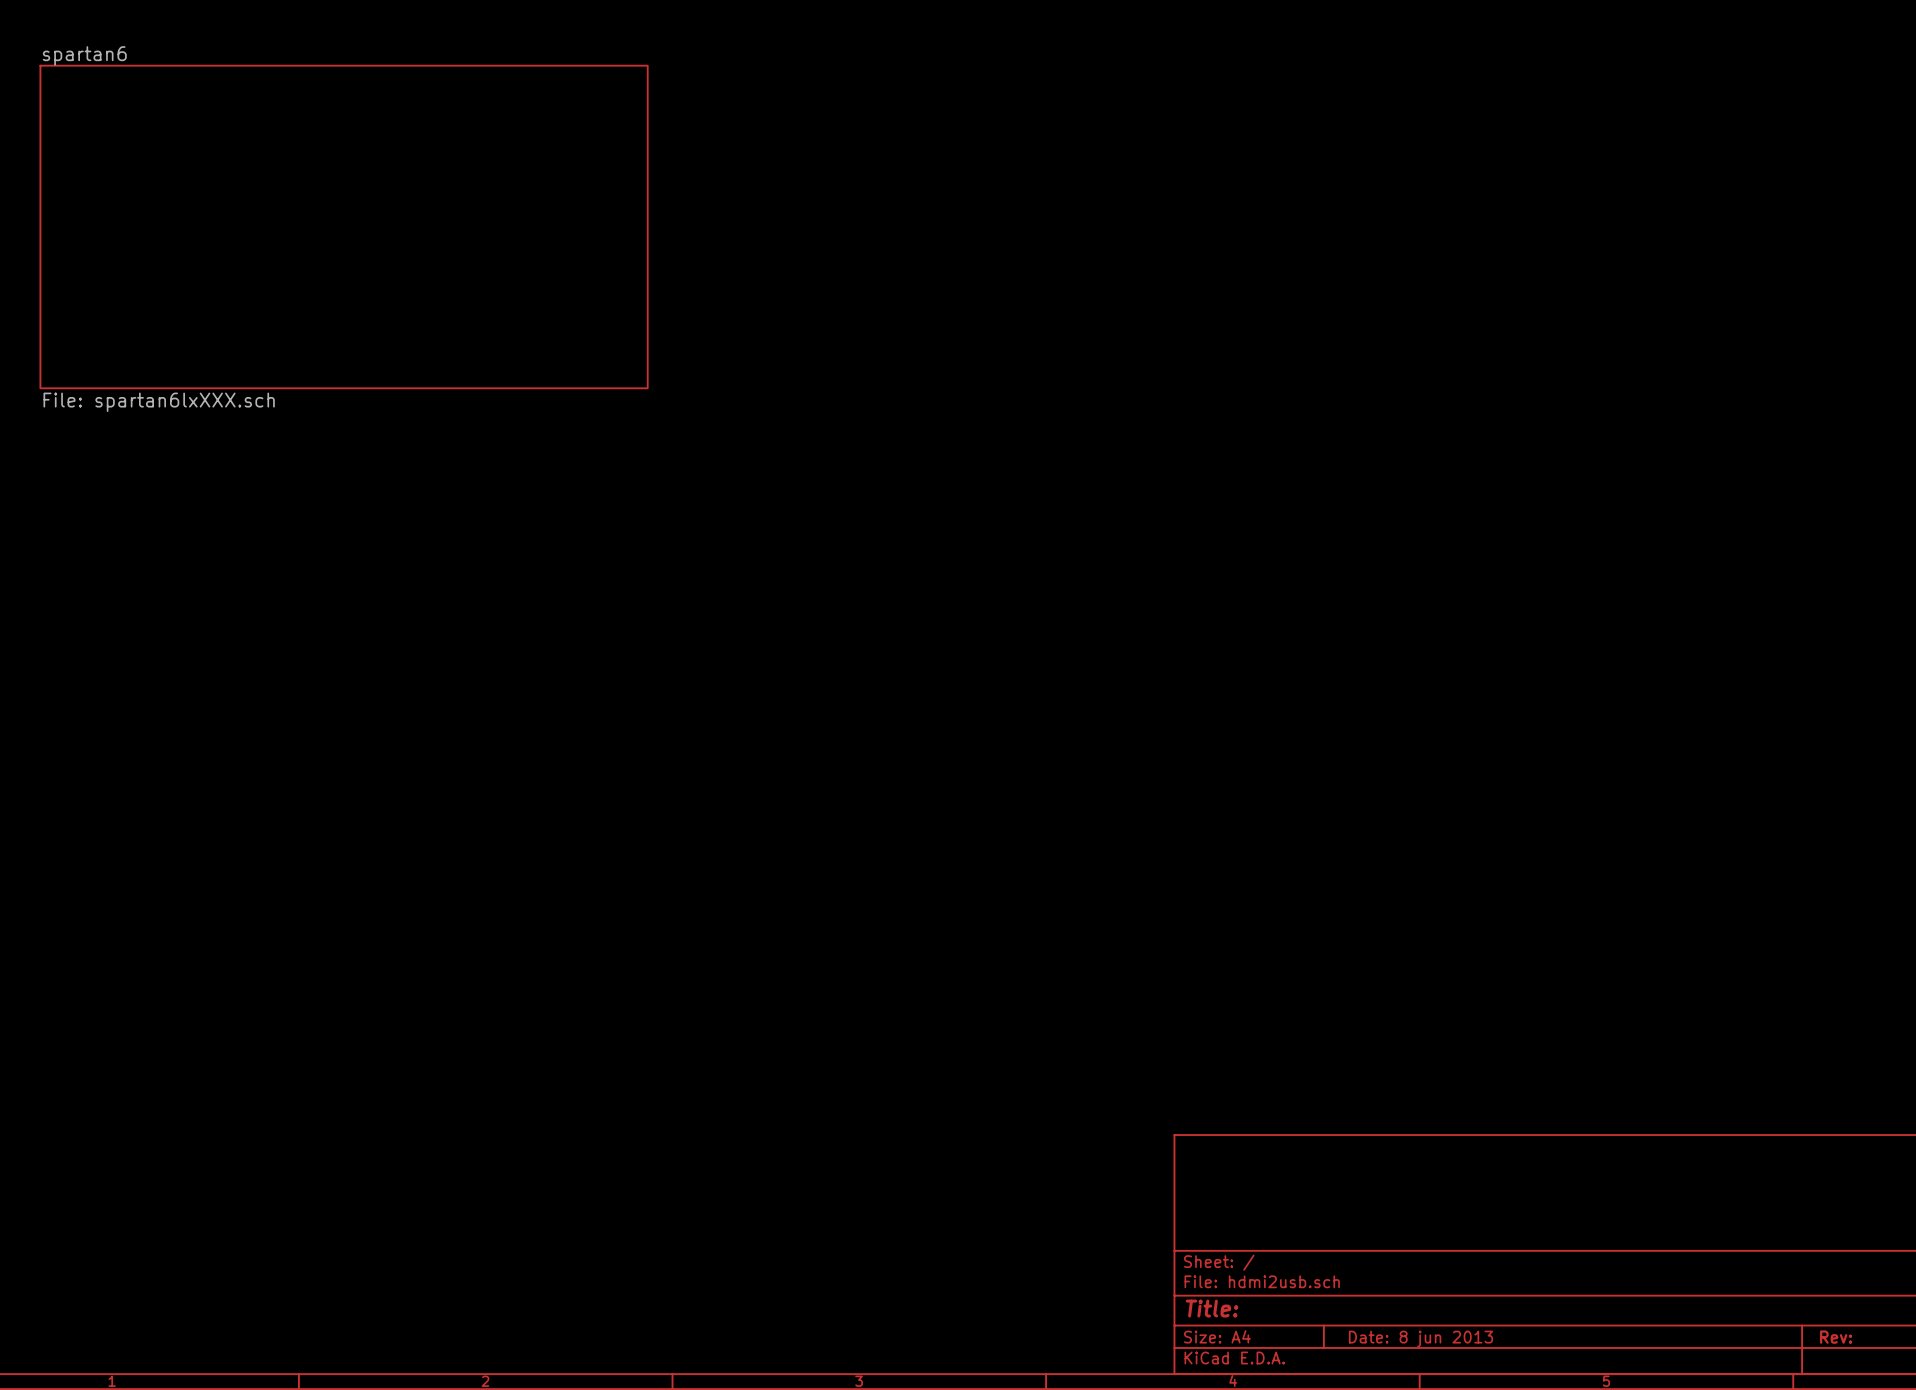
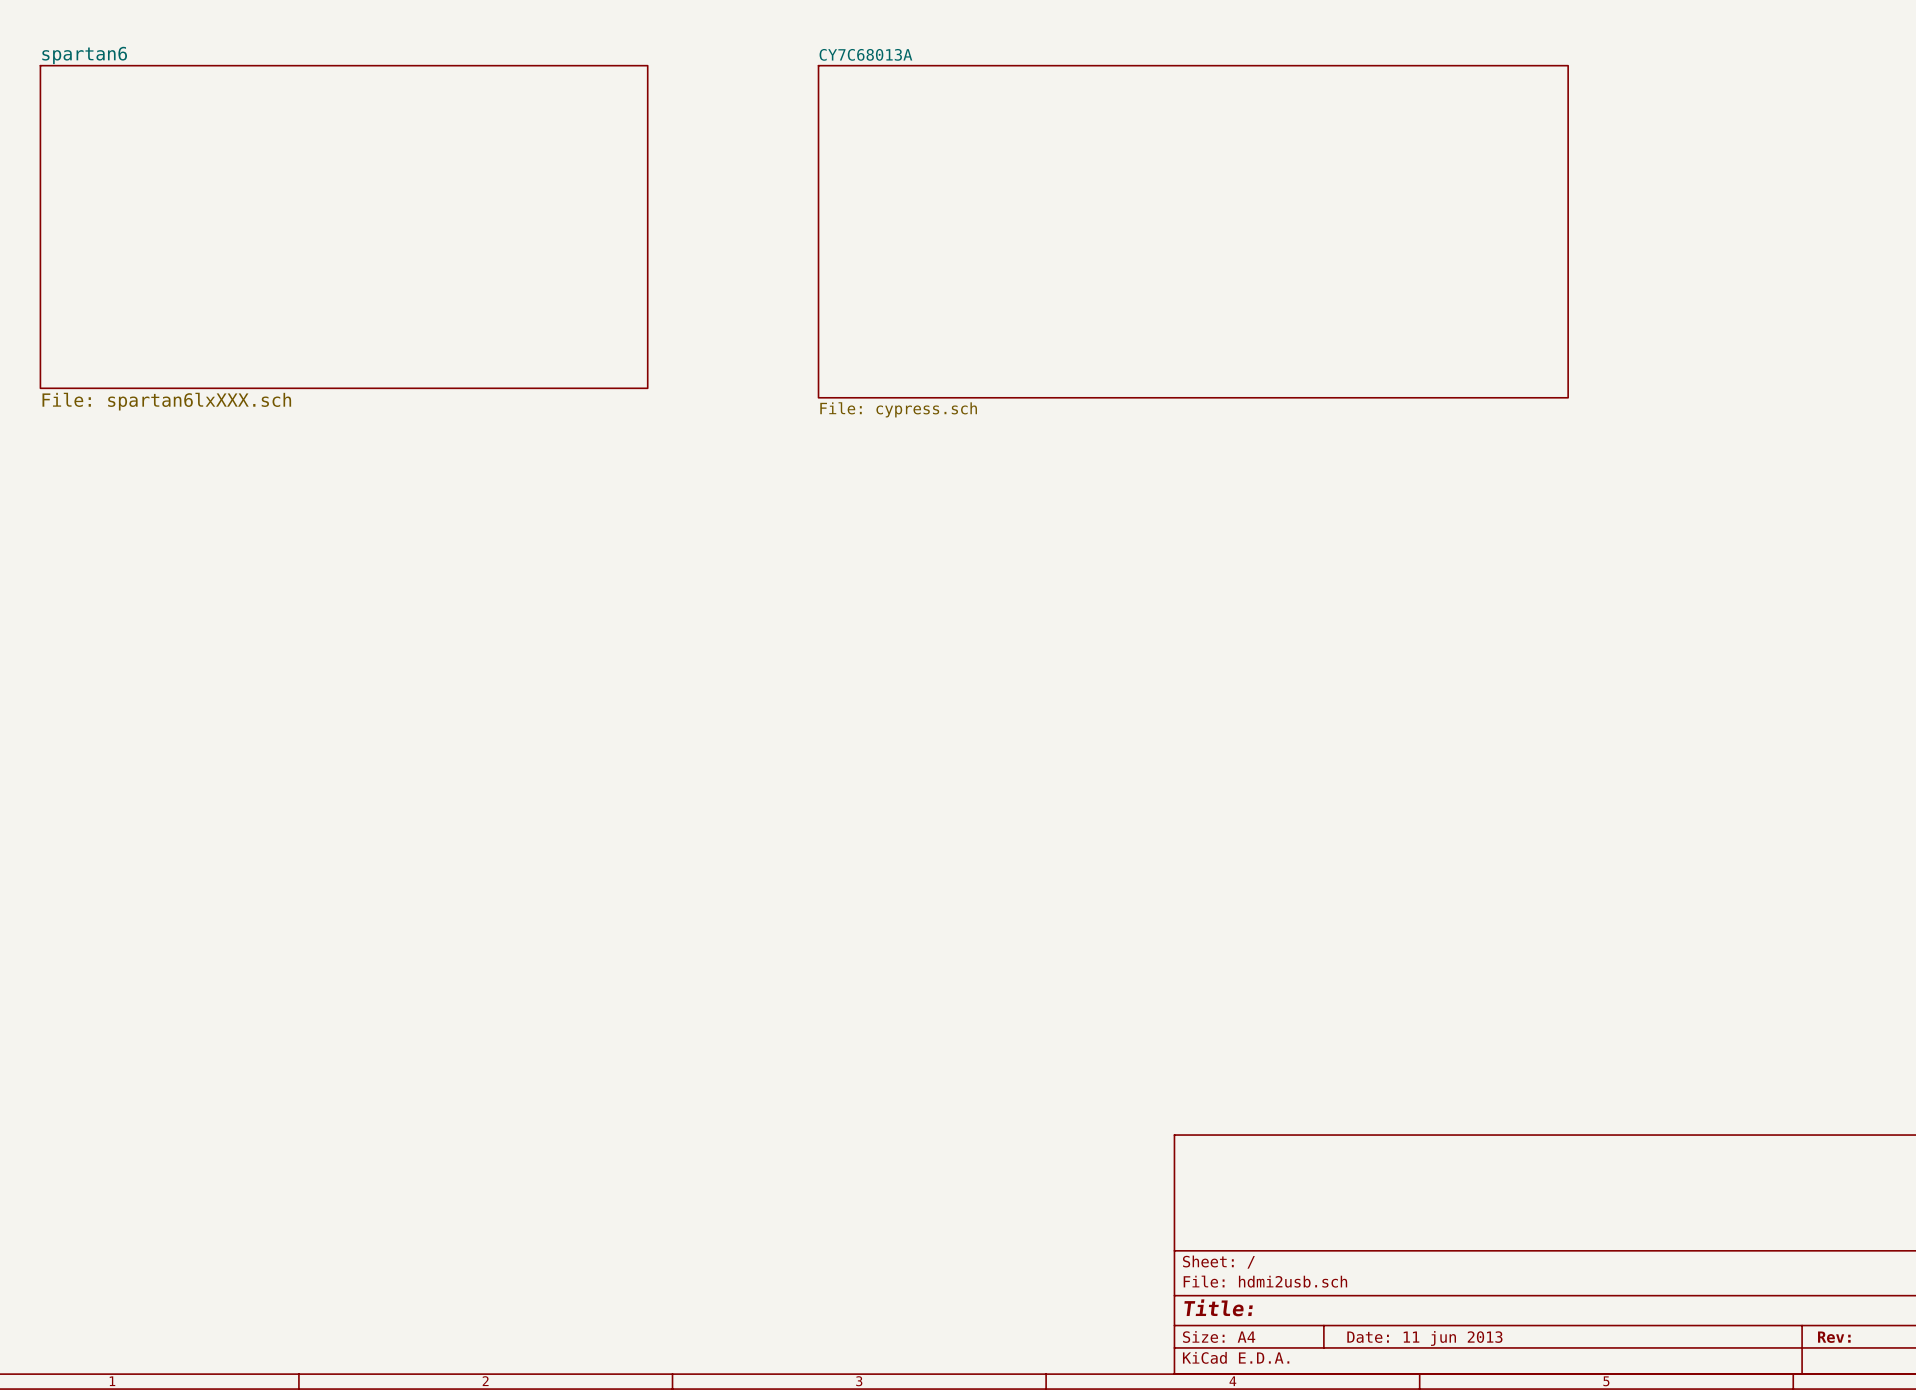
sheet CY7C68013A: none -> File: cypress.sch (1193, 231)
title block: Date: 8 jun 2013 (1420, 1338) -> Date: 11 jun 2013 (1424, 1338)

